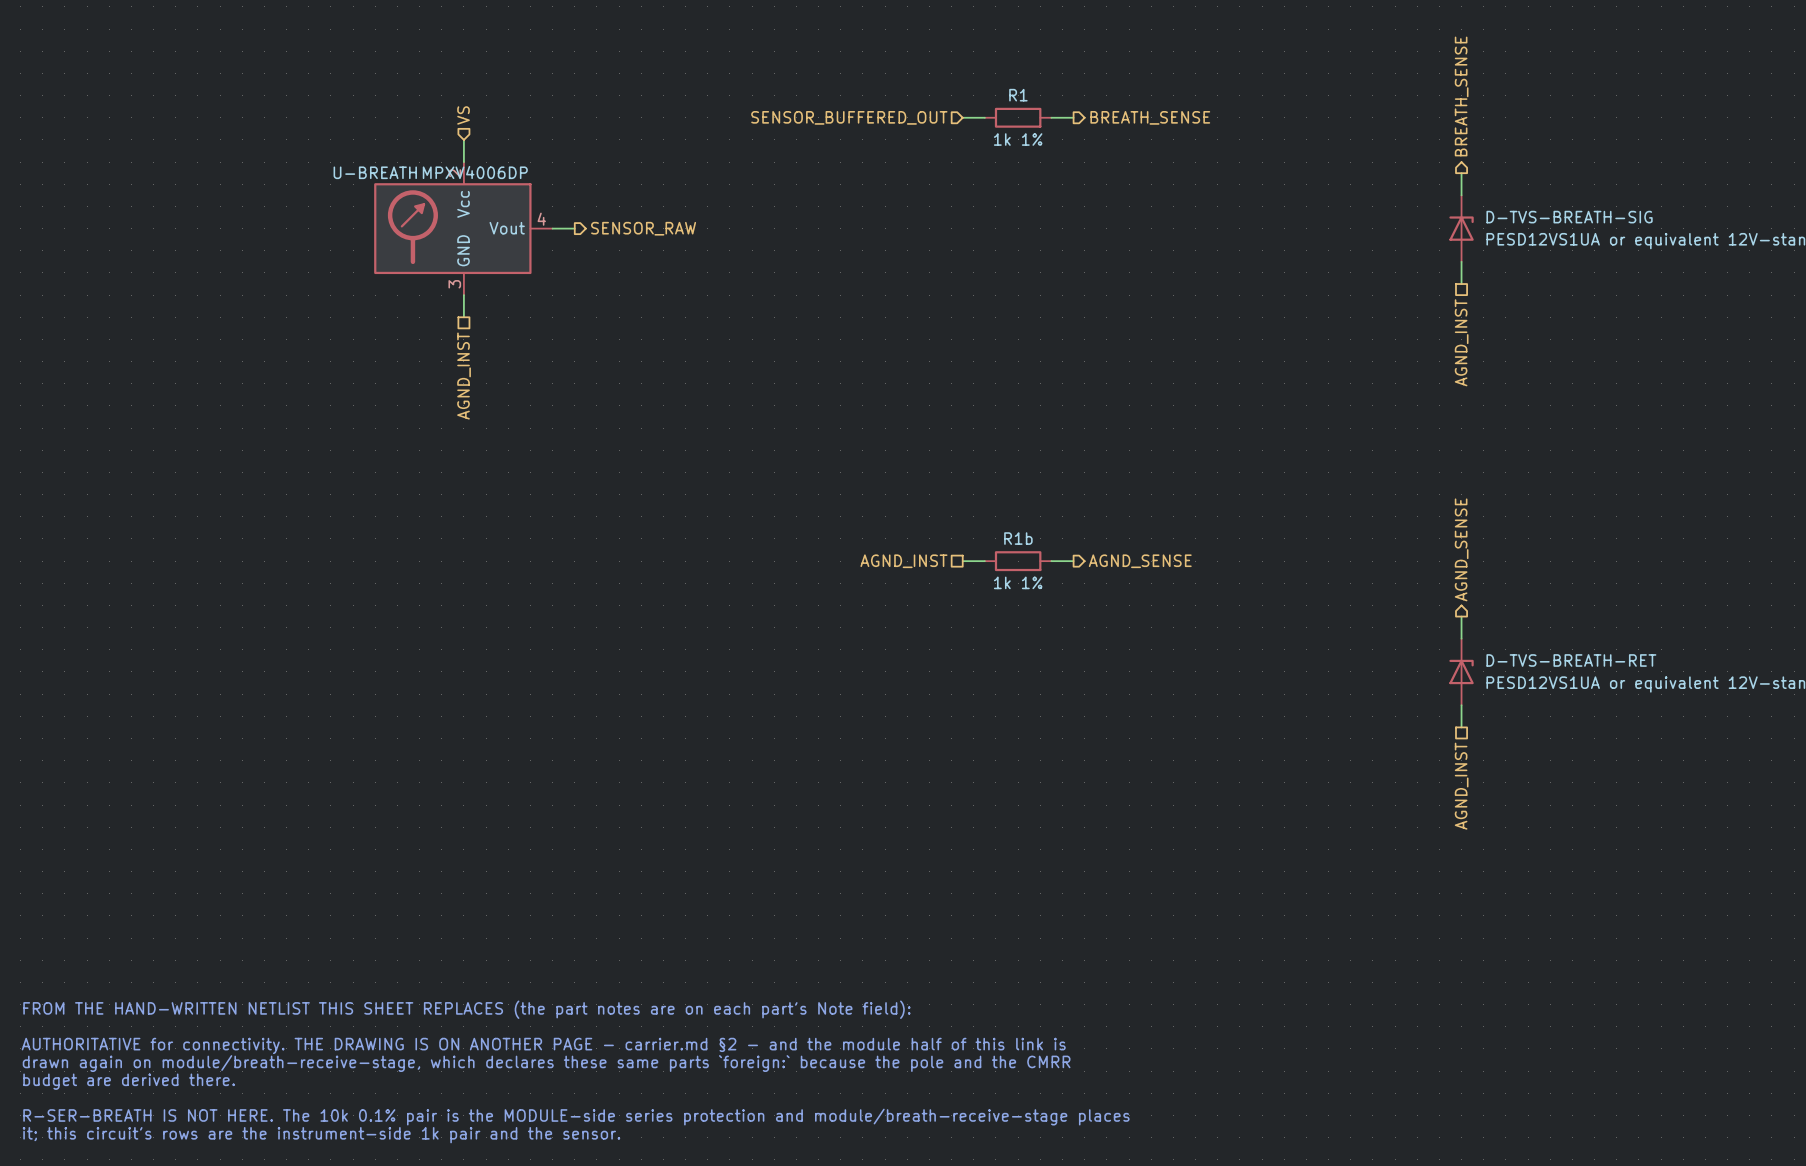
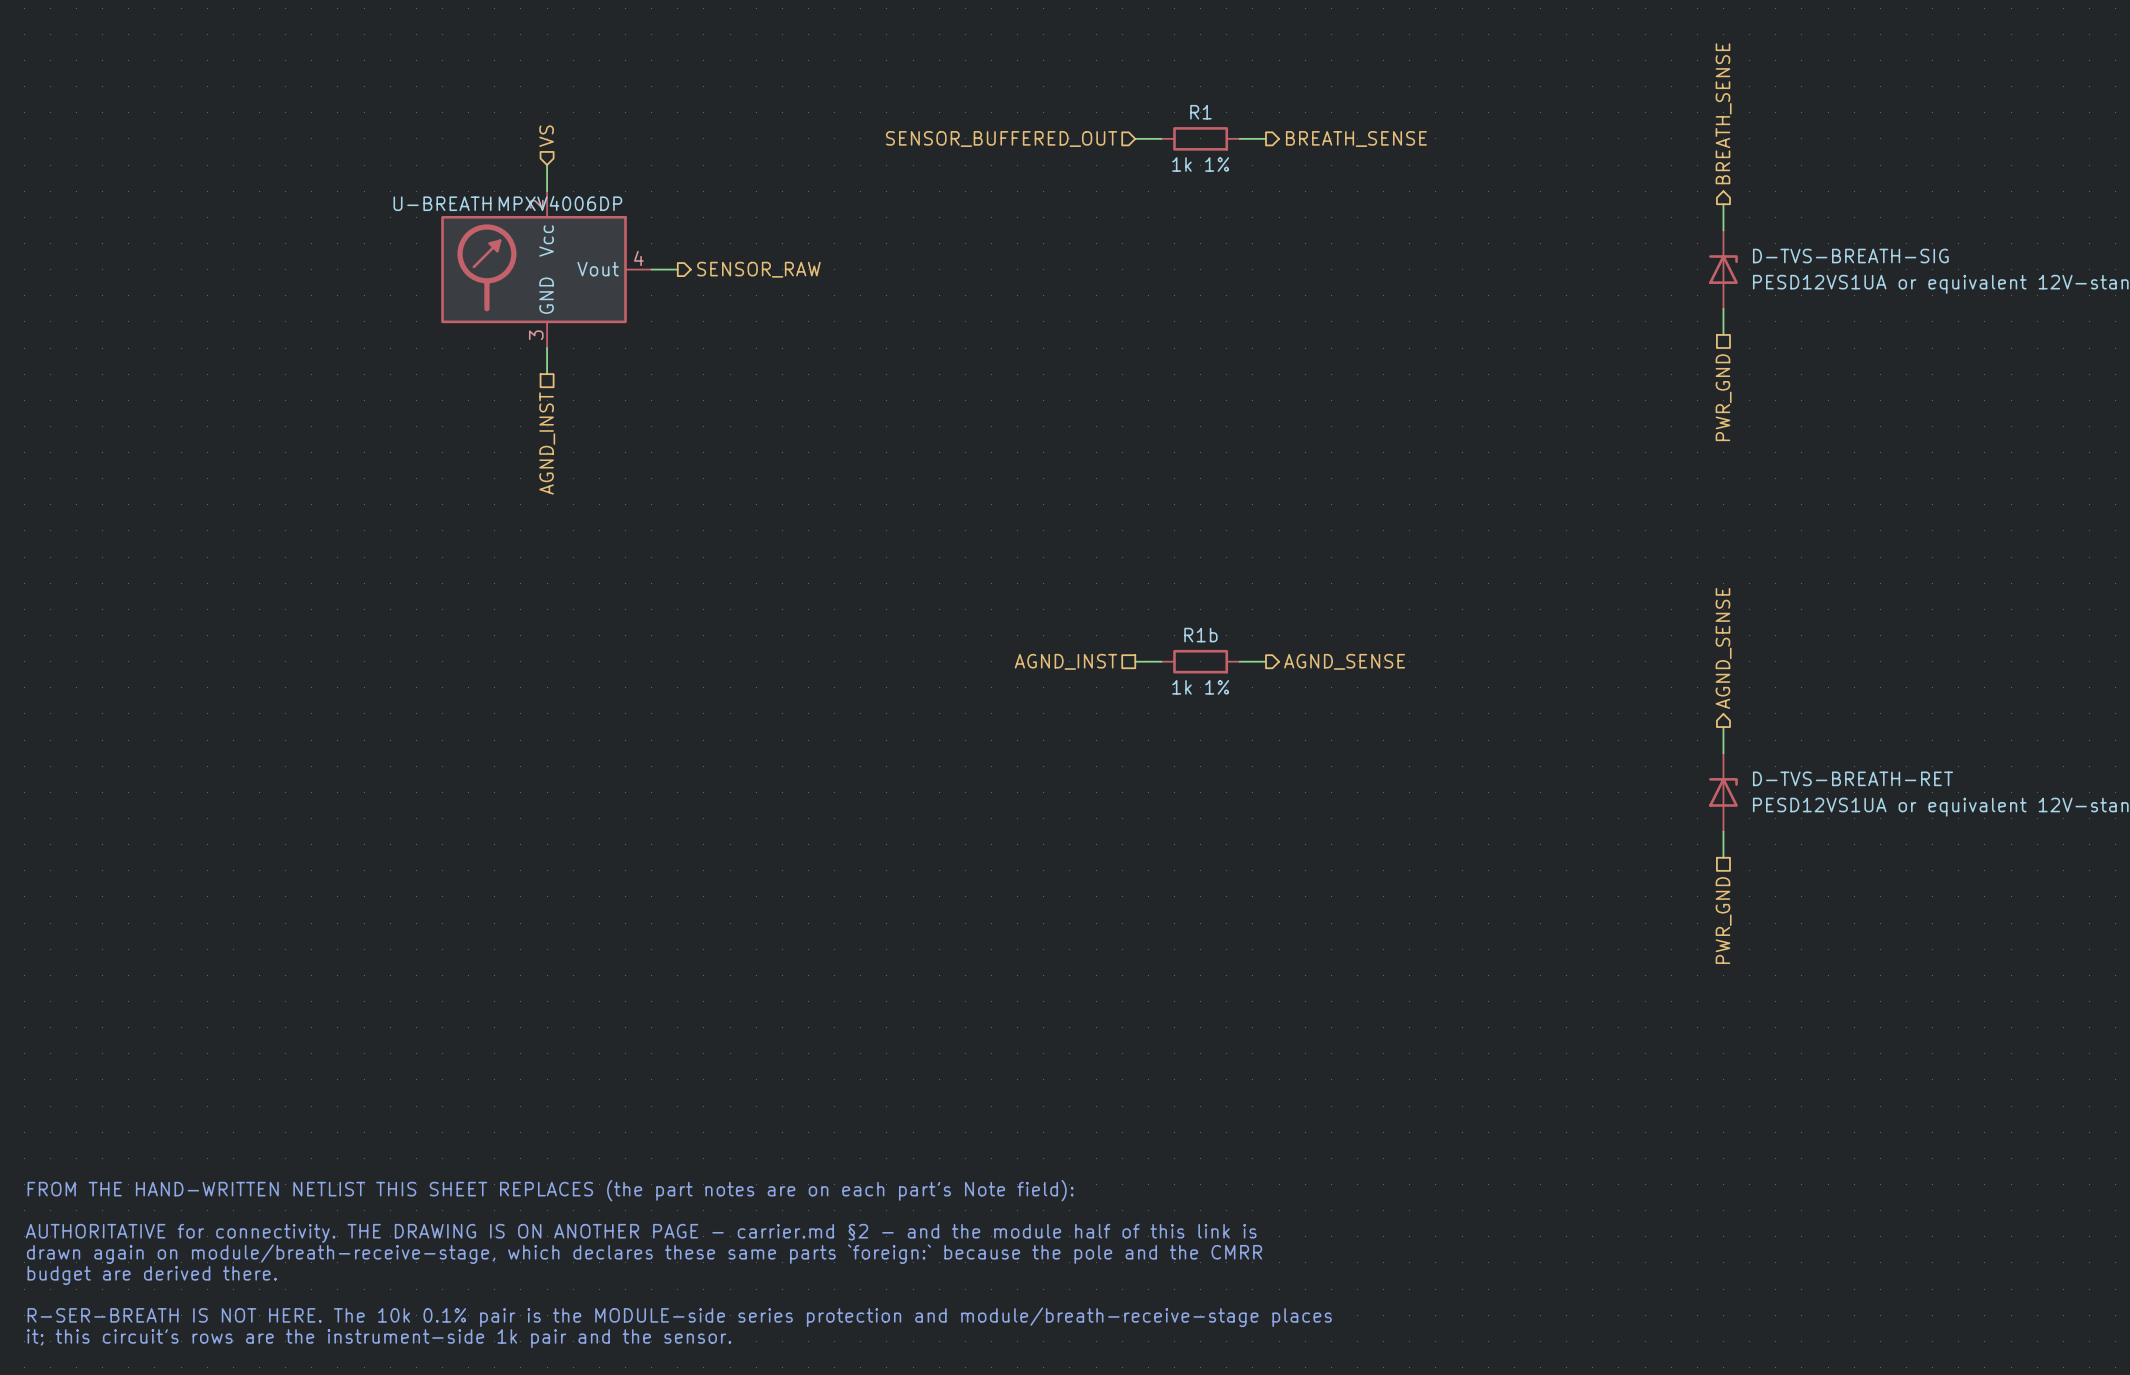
hierarchical label: AGND_INST (1461, 342) -> PWR_GND (1723, 397)
hierarchical label: AGND_INST (1461, 786) -> PWR_GND (1723, 920)

